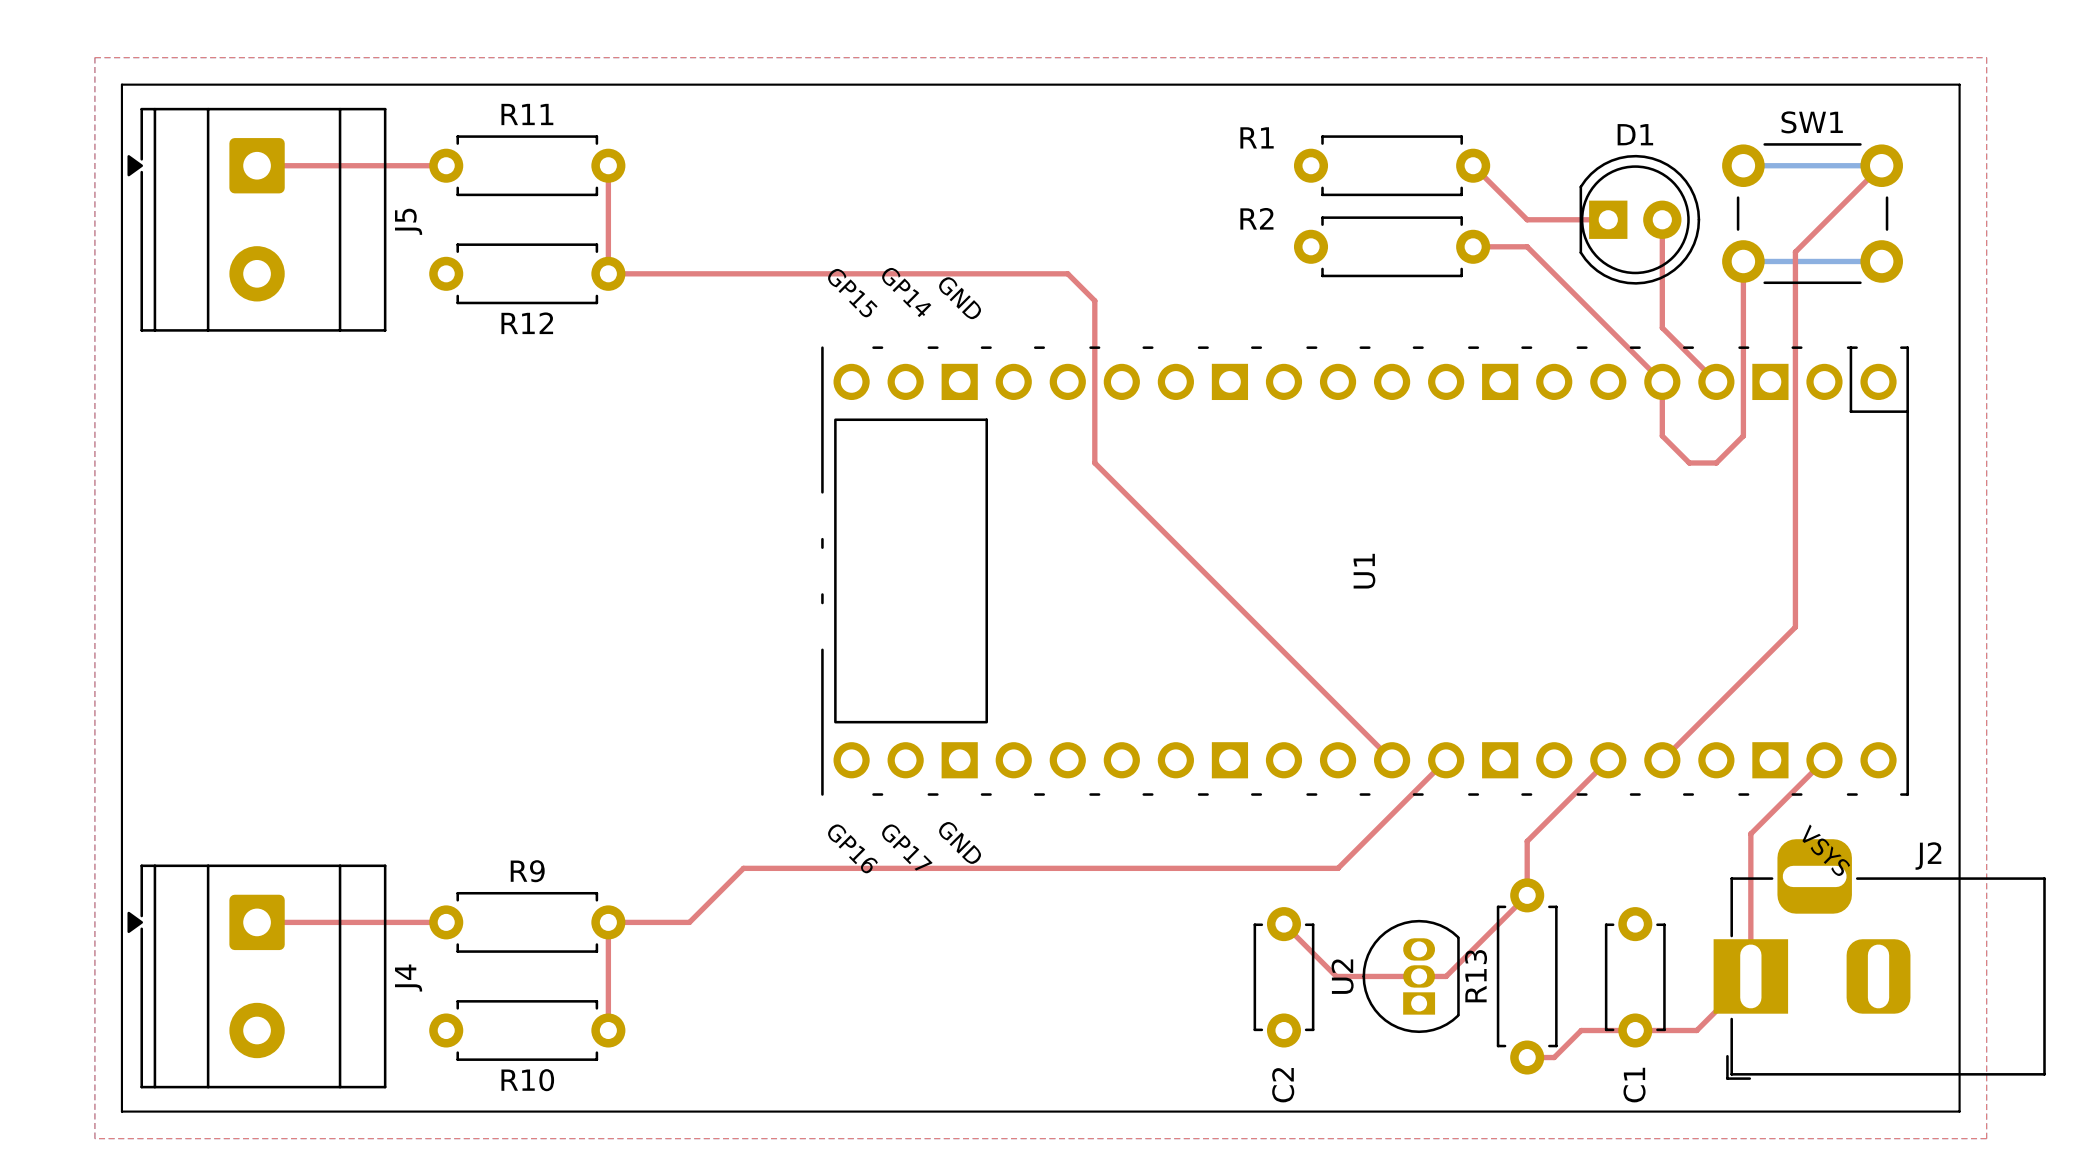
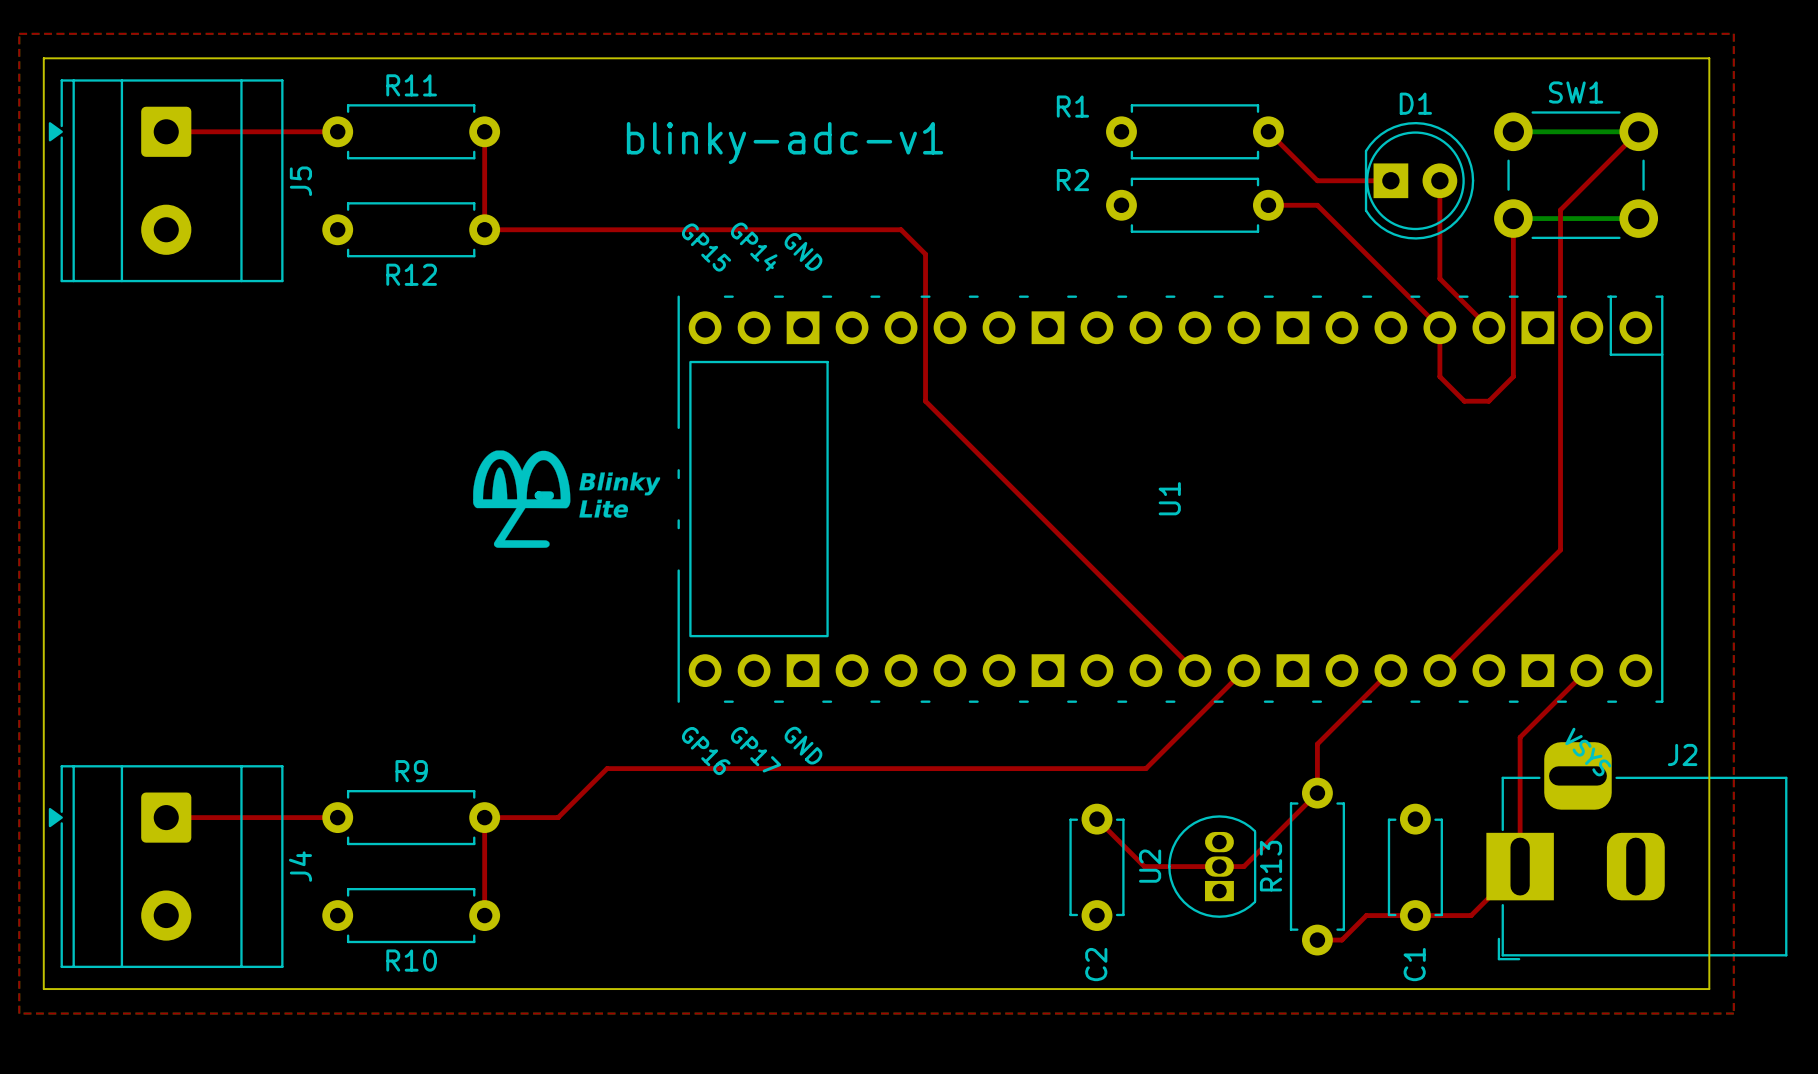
text: none -> blinky-adc-v1 (784, 143)
drawing: none -> [473, 450, 661, 548]

